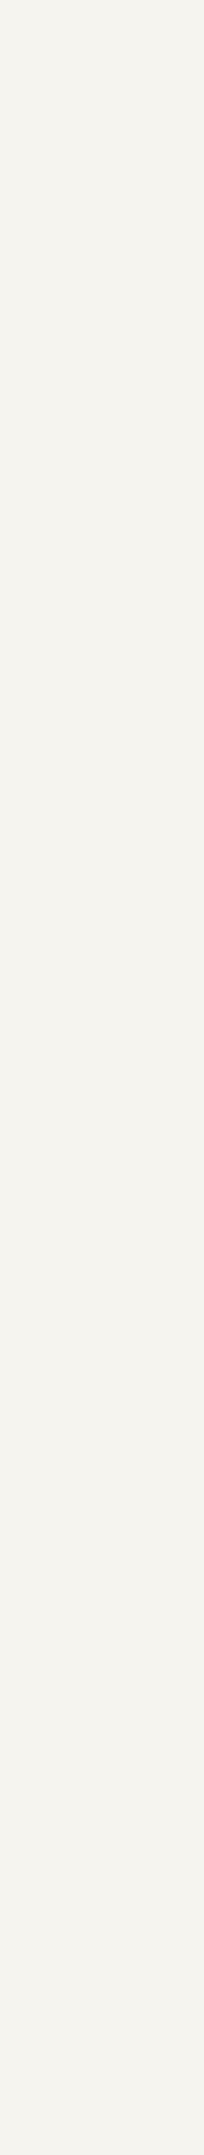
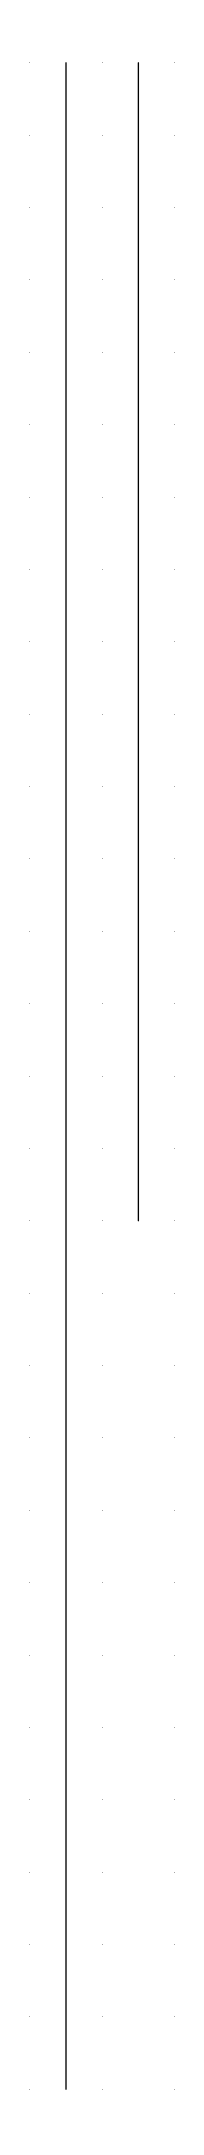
bus: none -> (66, 62) (66, 2089)
bus: none -> (138, 62) (138, 1220)

